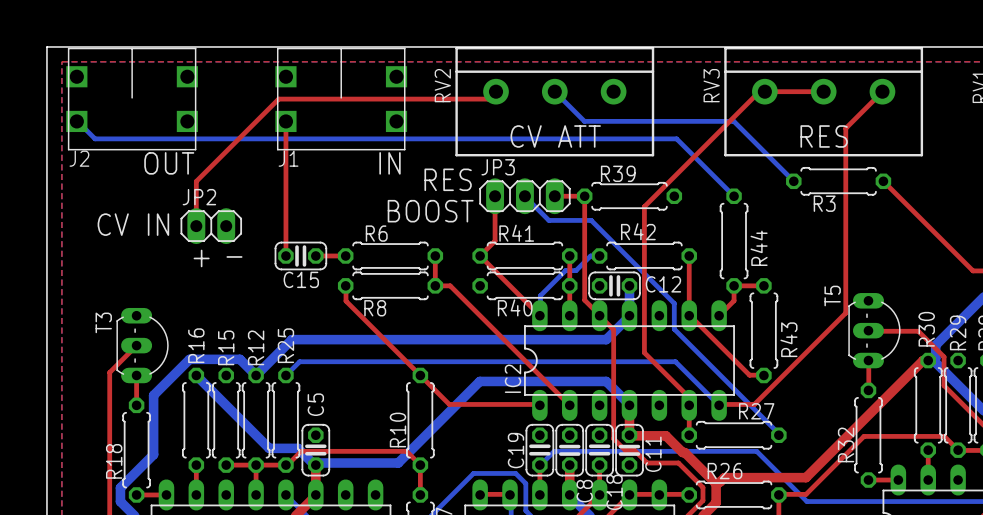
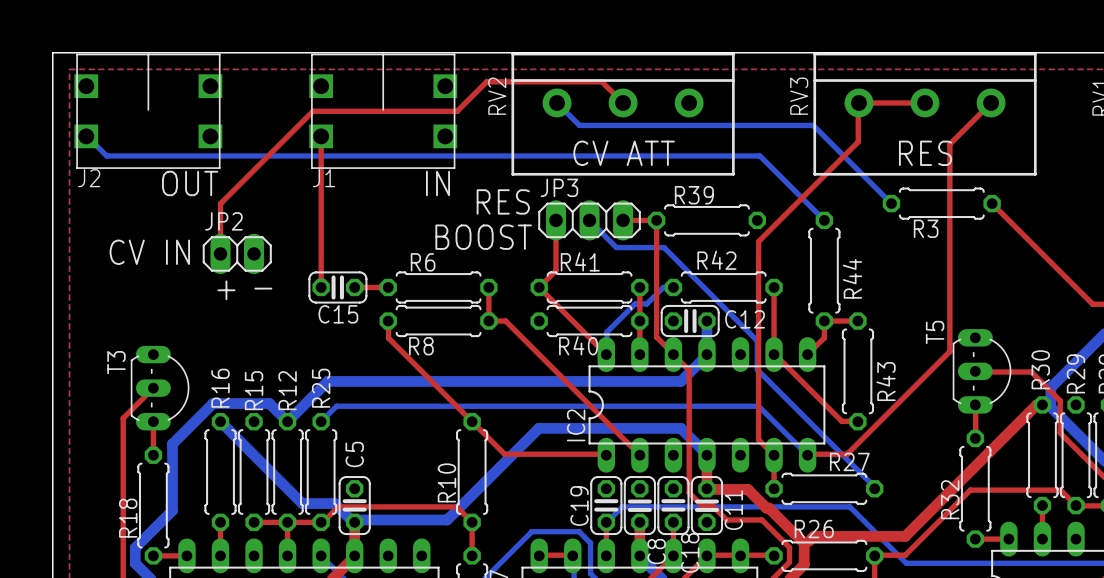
top track: (496, 91) (488, 99) (407, 99) -> (623, 102) (601, 81) (486, 81) (457, 111)
bottom track: (554, 91) (584, 121) (733, 121) -> (557, 102) (579, 125) (813, 125) (824, 136)
top track: (764, 91) (759, 91) (644, 206) (644, 352) (689, 397) (689, 405) -> (858, 102) (858, 141) (758, 241) (758, 439) (774, 455)

